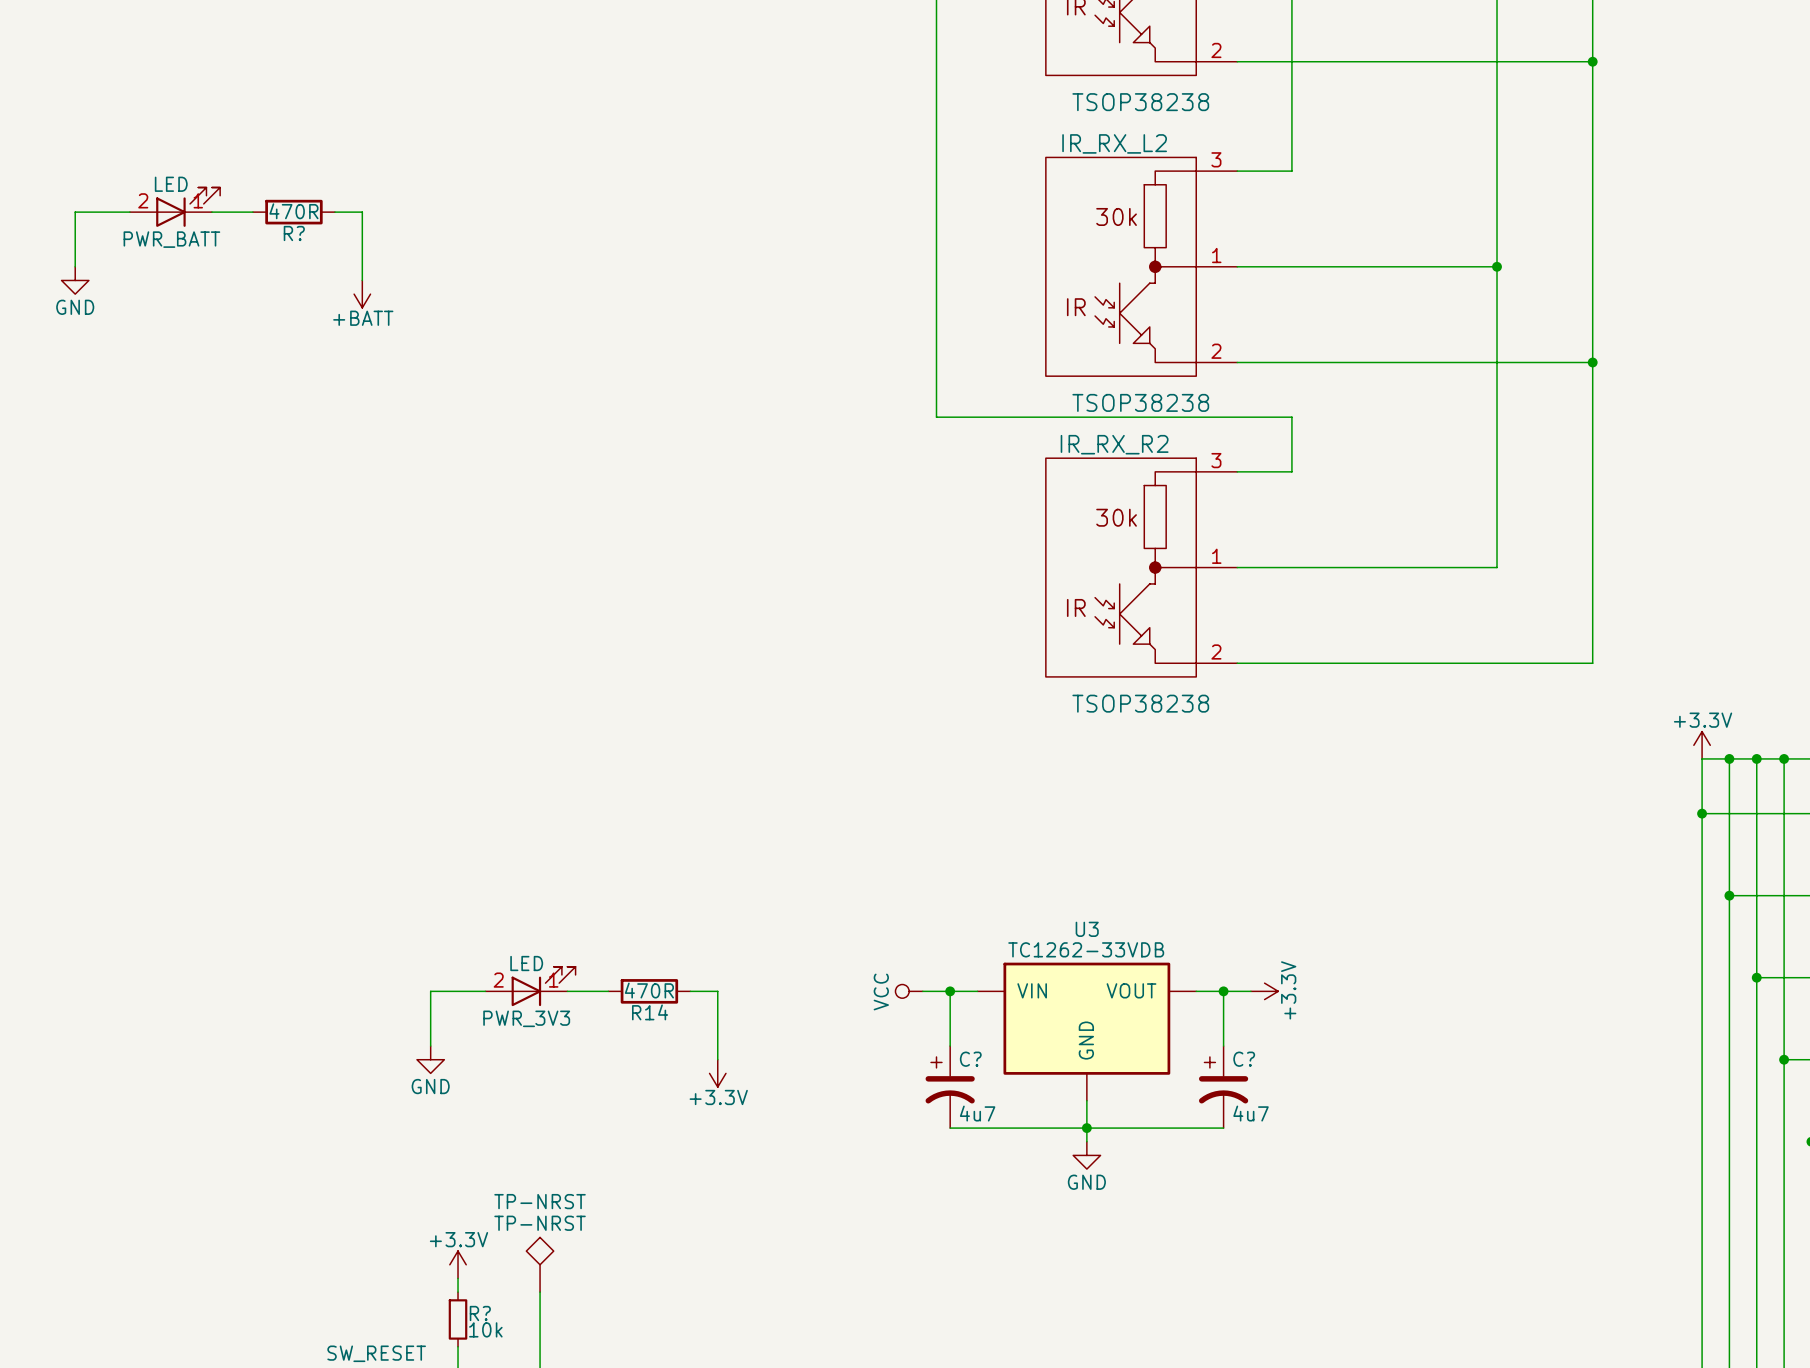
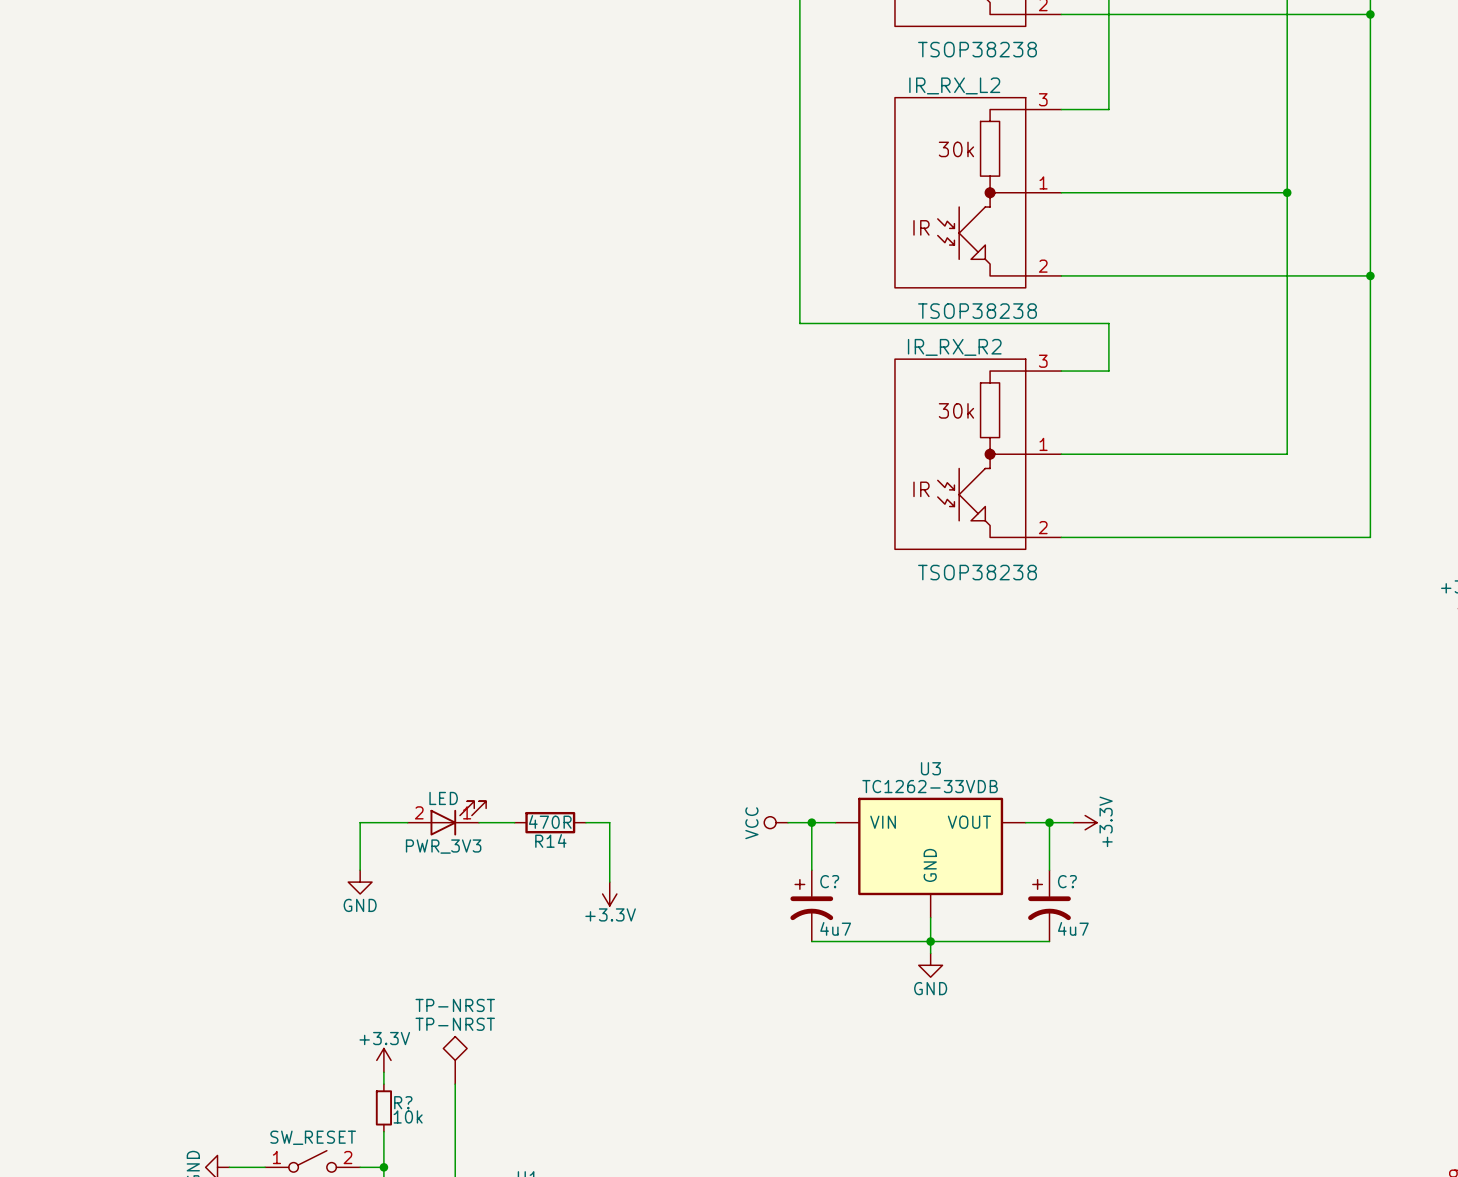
PWR_BATT: LED (175, 207) -> none
wire: (129, 212) (75, 212) (75, 266) -> none
wire: (211, 212) (252, 212) -> none
R?: 470R (293, 212) -> none
wire: (334, 212) (362, 212) (362, 280) -> none
power symbol: GND (75, 280) -> none
power symbol: +BATT (362, 294) -> none

